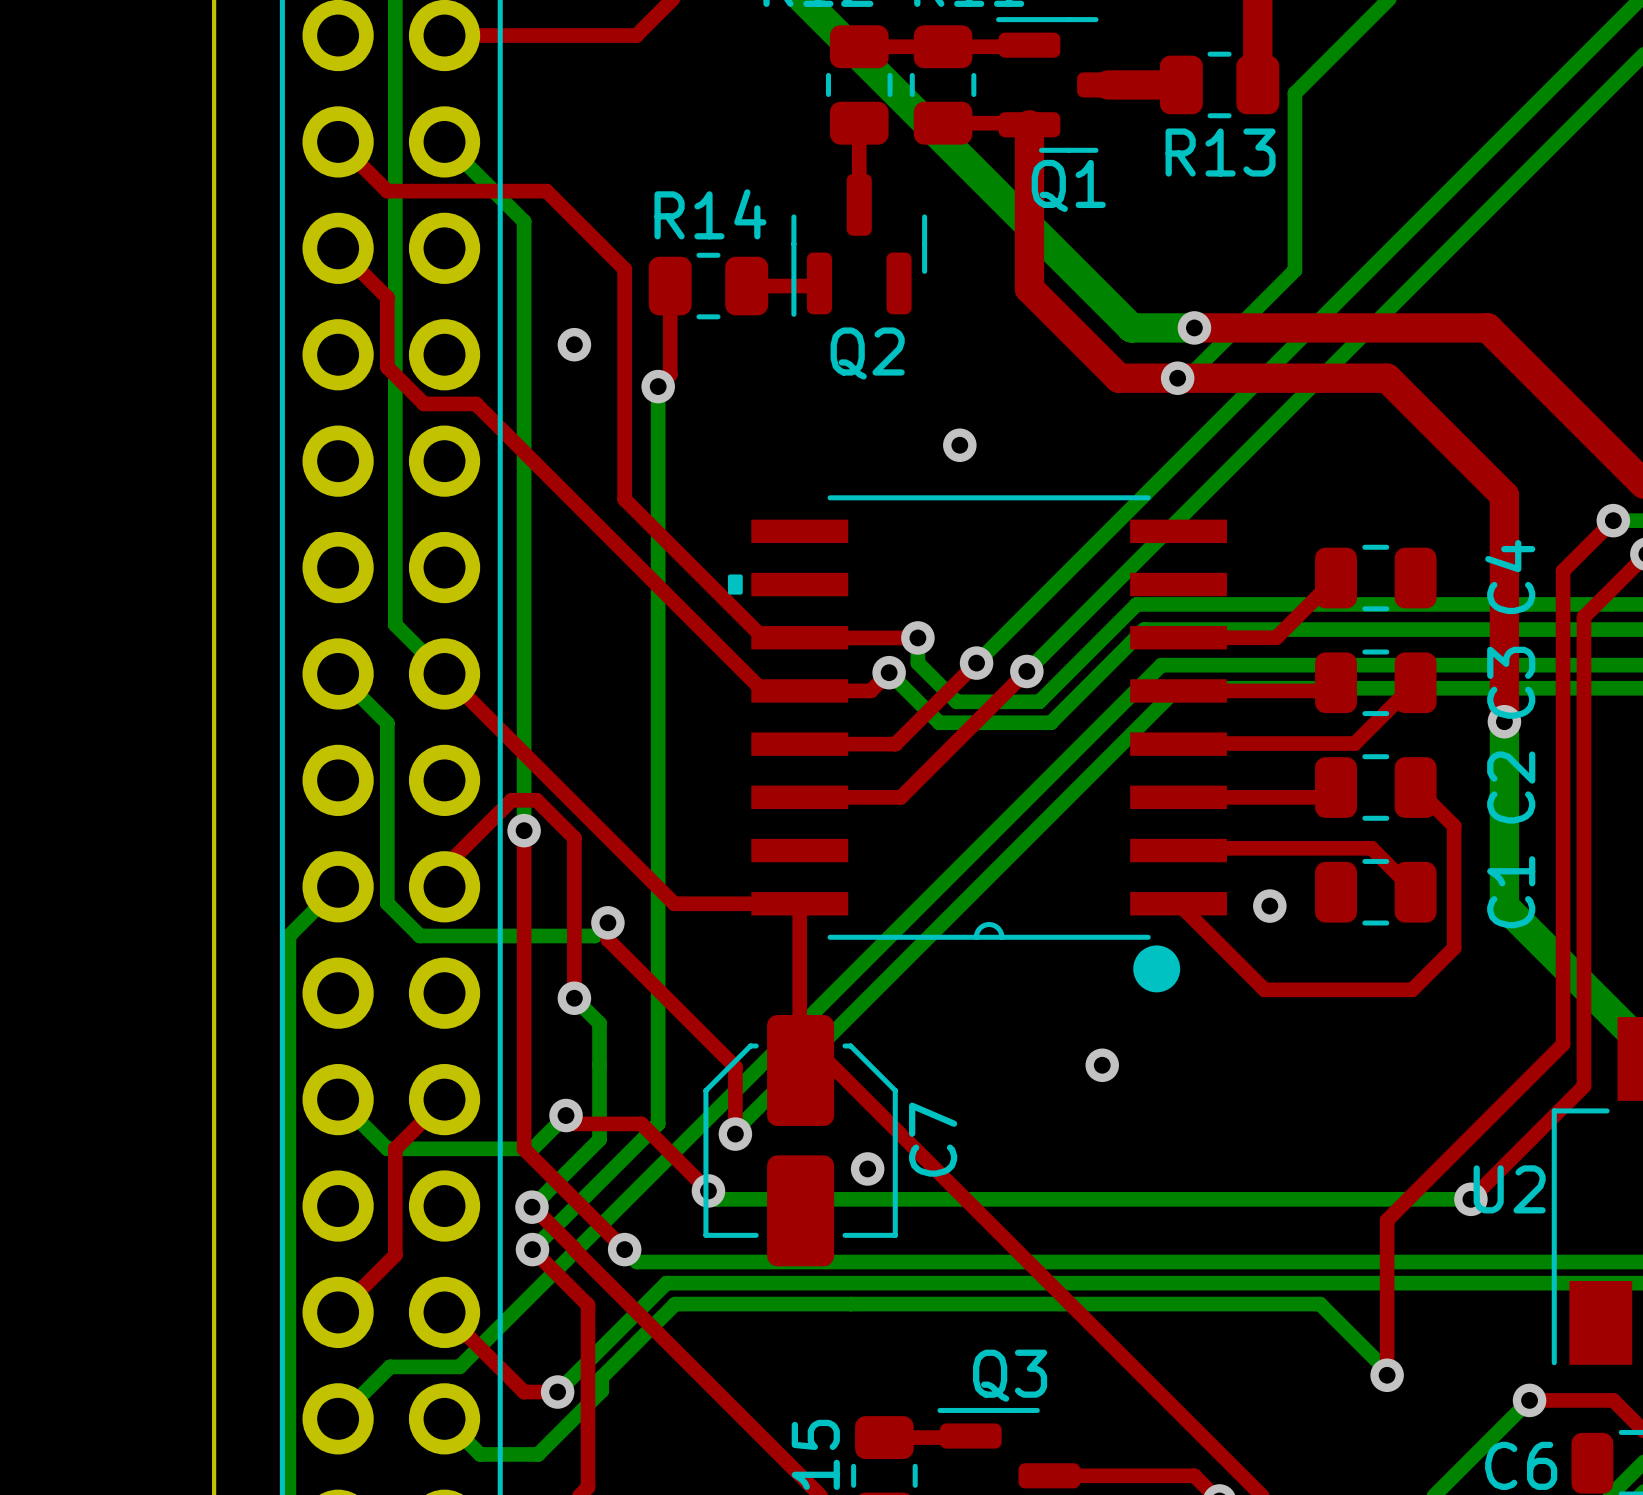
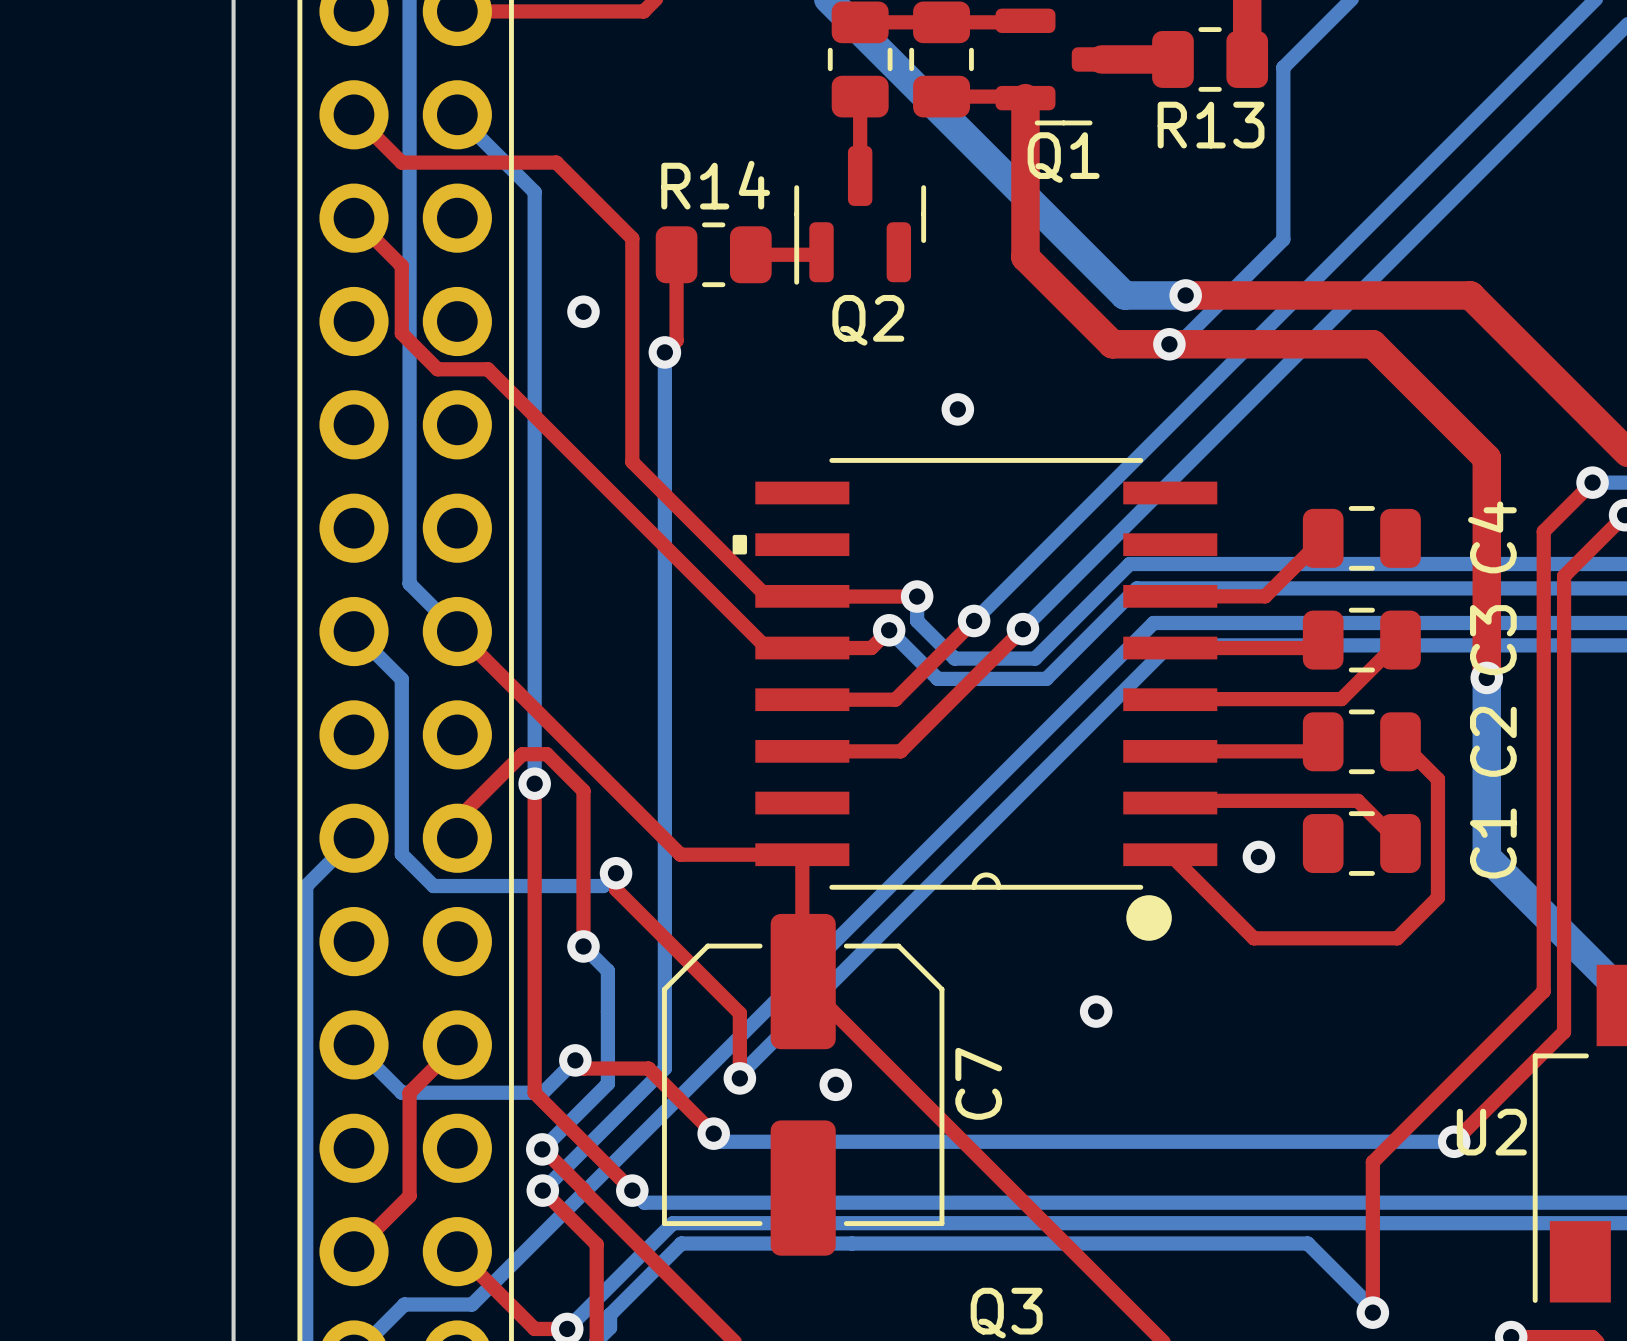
C7 footprint: [703, 1014, 898, 1267] -> [662, 913, 945, 1256]
via position: (867, 1168) -> (835, 1084)

